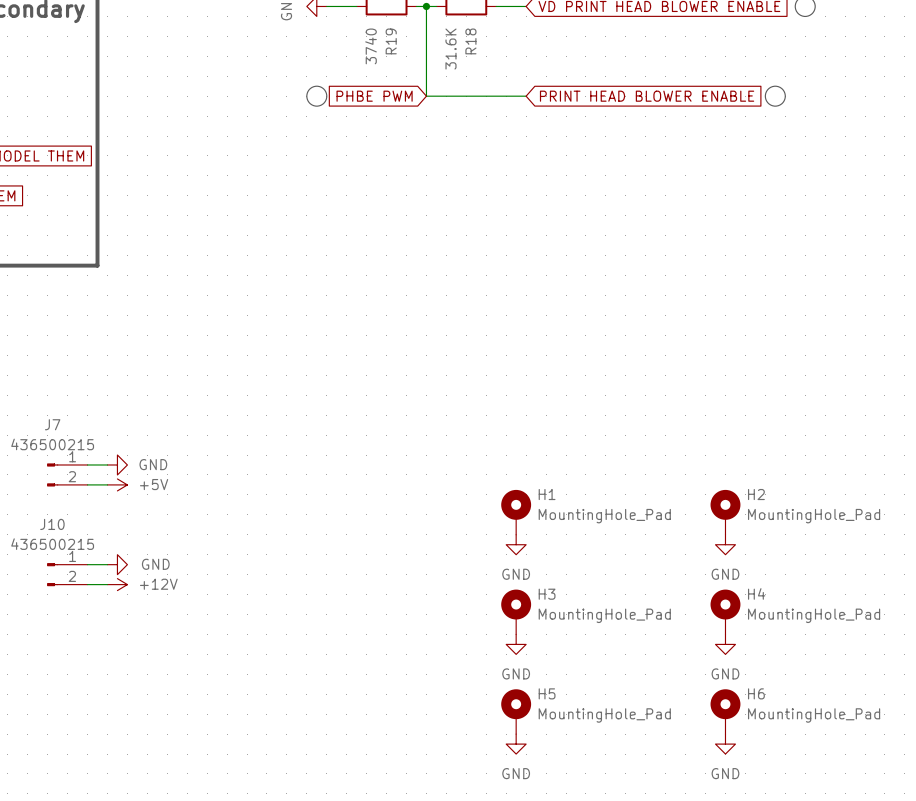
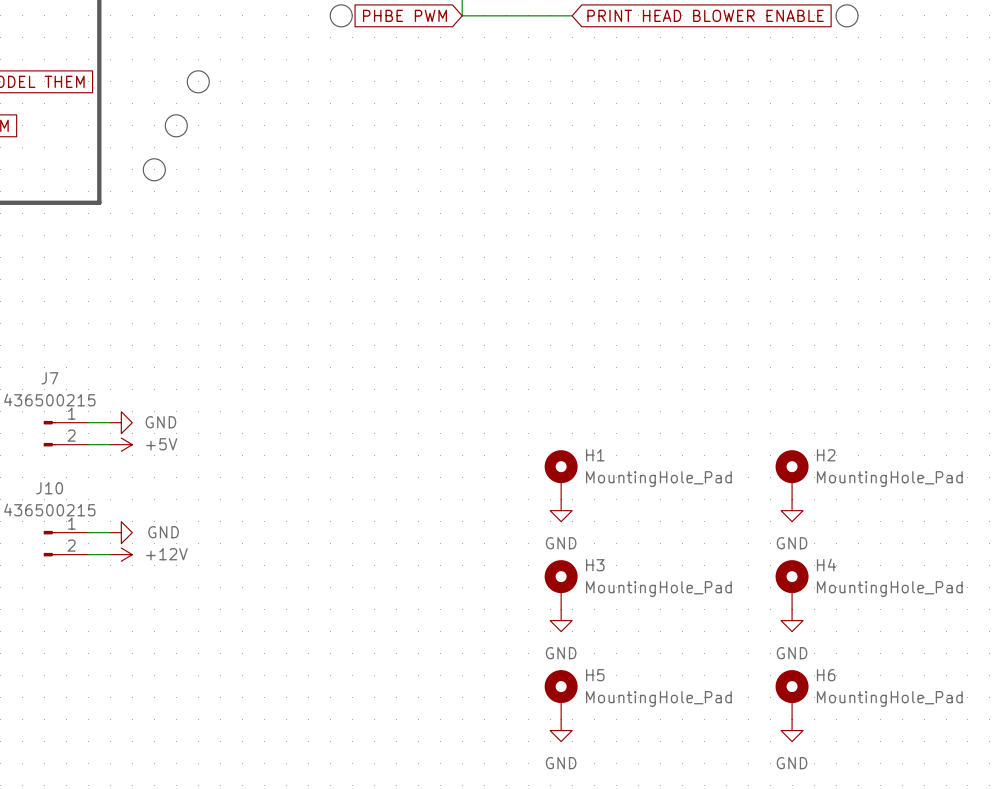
drawing: none -> [187, 70, 210, 93]
drawing: none -> [165, 114, 188, 137]
drawing: none -> [143, 158, 166, 181]

